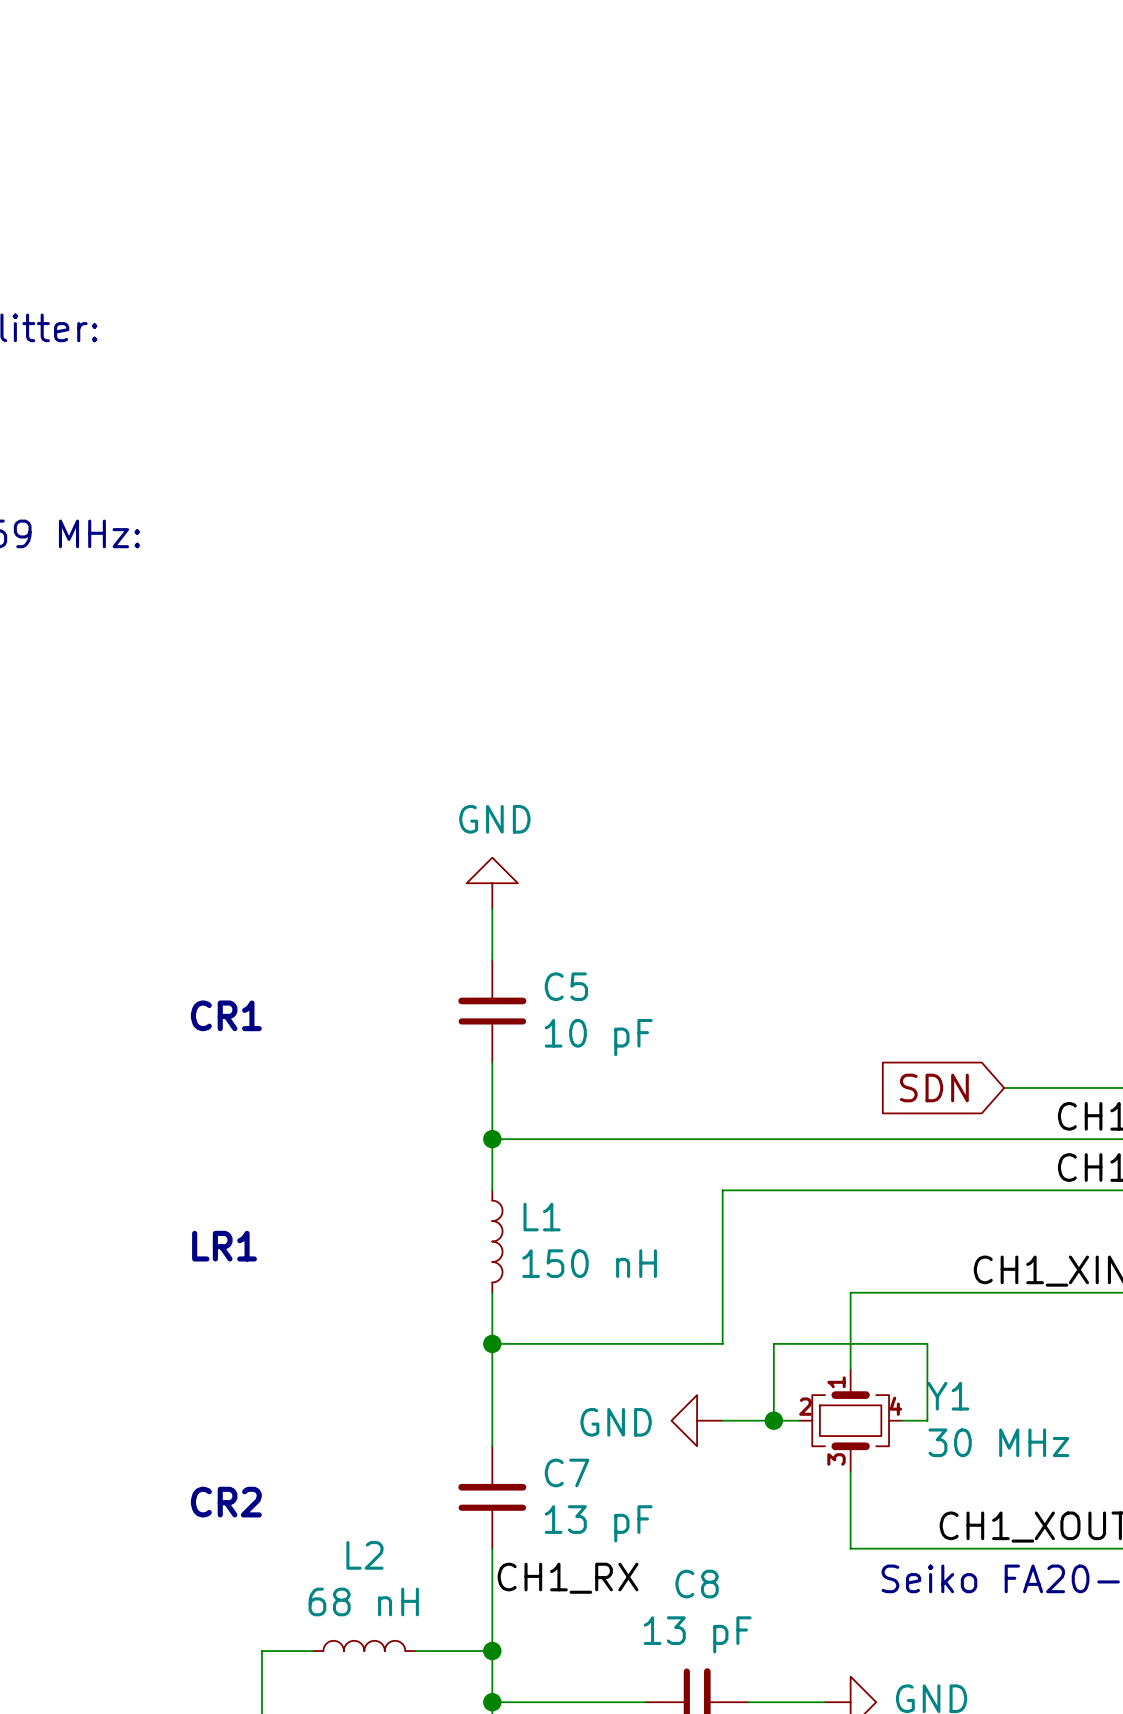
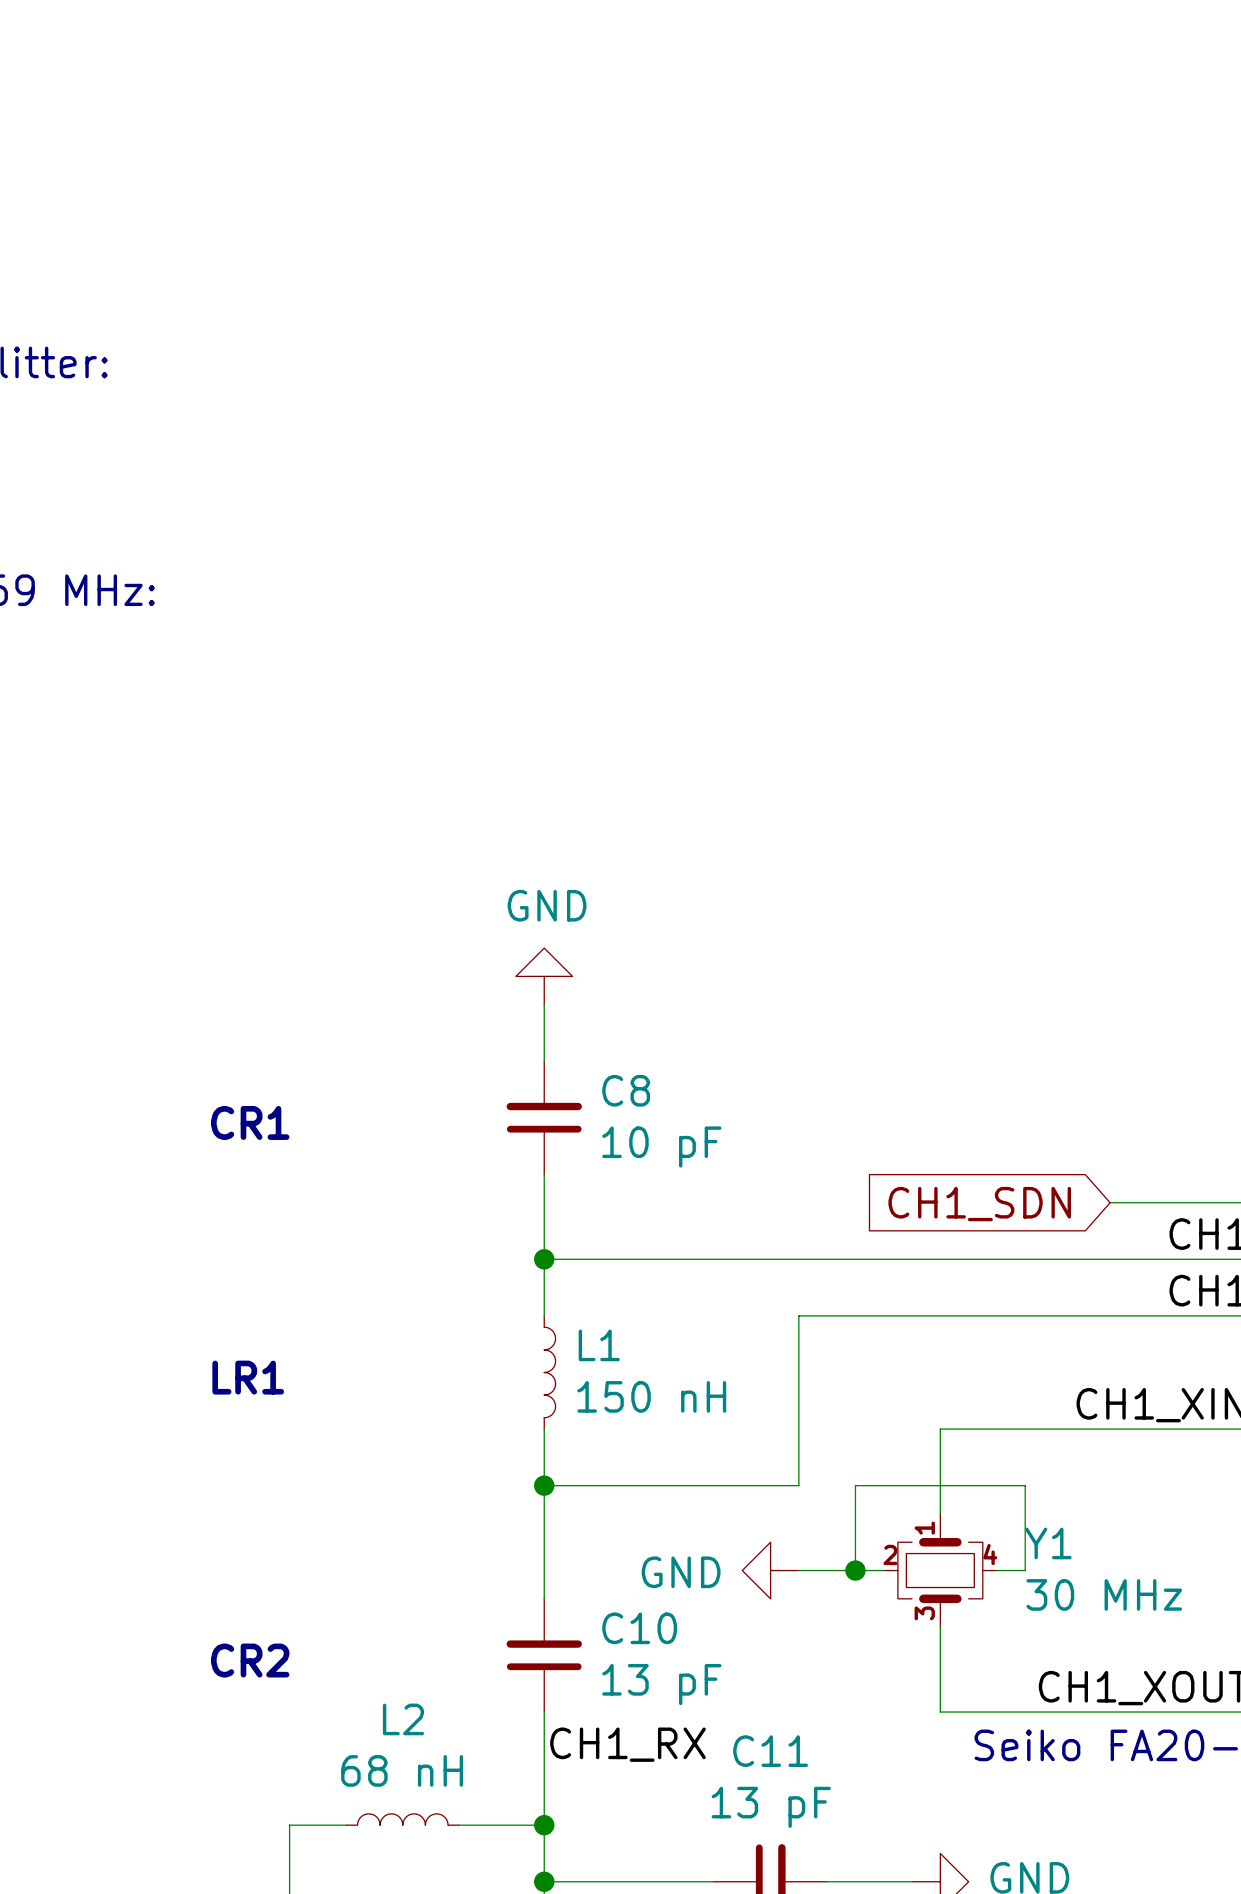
C5 name: C5 (566, 986) -> C8 (626, 1090)
global label: SDN (934, 1087) -> CH1_SDN (979, 1204)
C7 name: C7 (567, 1472) -> C10 (639, 1628)
C8 name: C8 (697, 1584) -> C11 (770, 1751)

